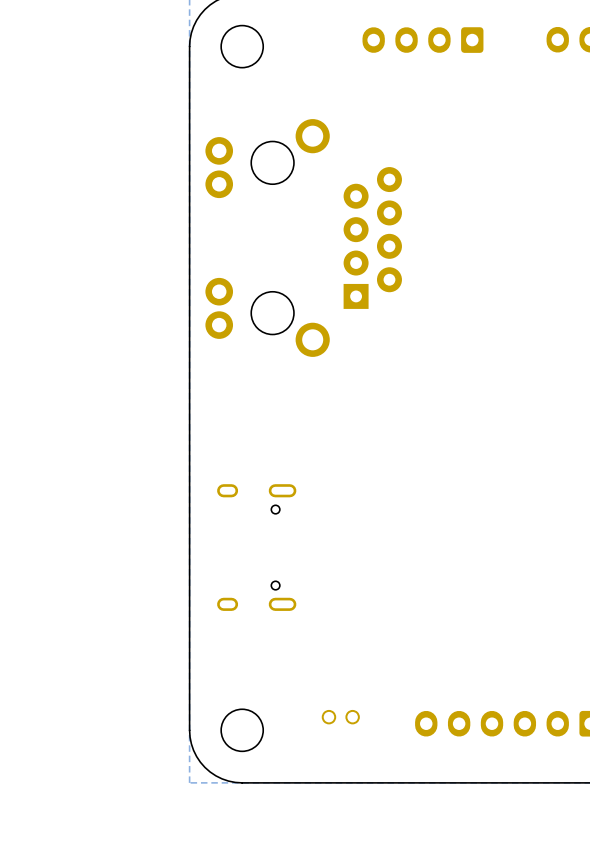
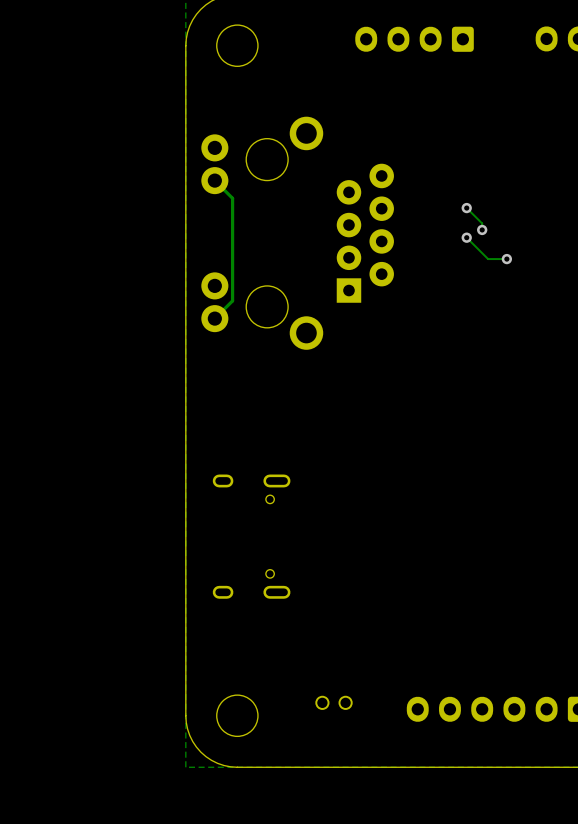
track: none -> (214, 180) (232, 198) (232, 300) (214, 318)
track: none -> (466, 208) (482, 223) (482, 229)
via: none -> (466, 208)
via: none -> (482, 229)
track: none -> (466, 237) (488, 259) (506, 259)
via: none -> (466, 237)
via: none -> (506, 259)

